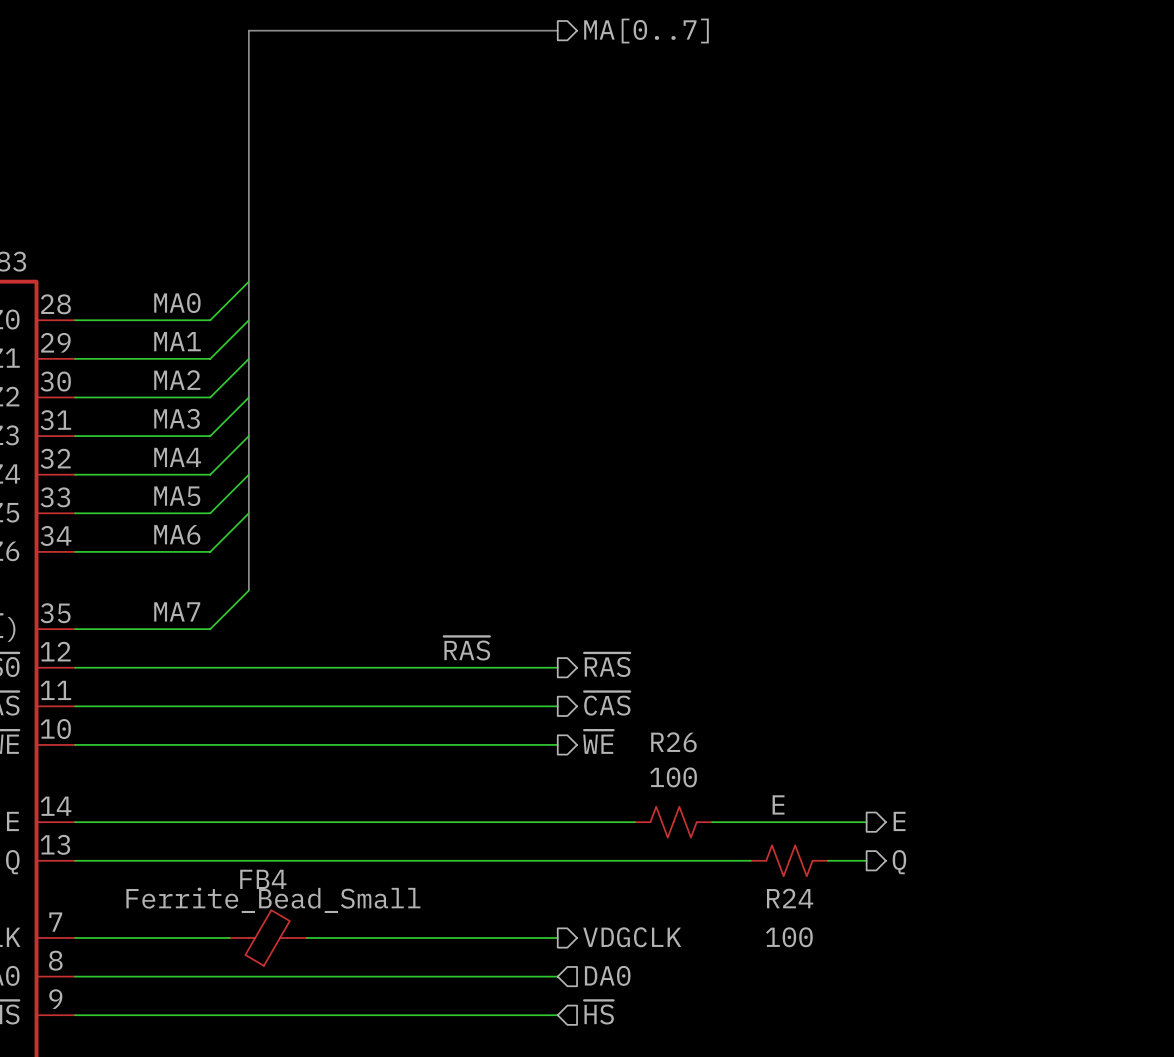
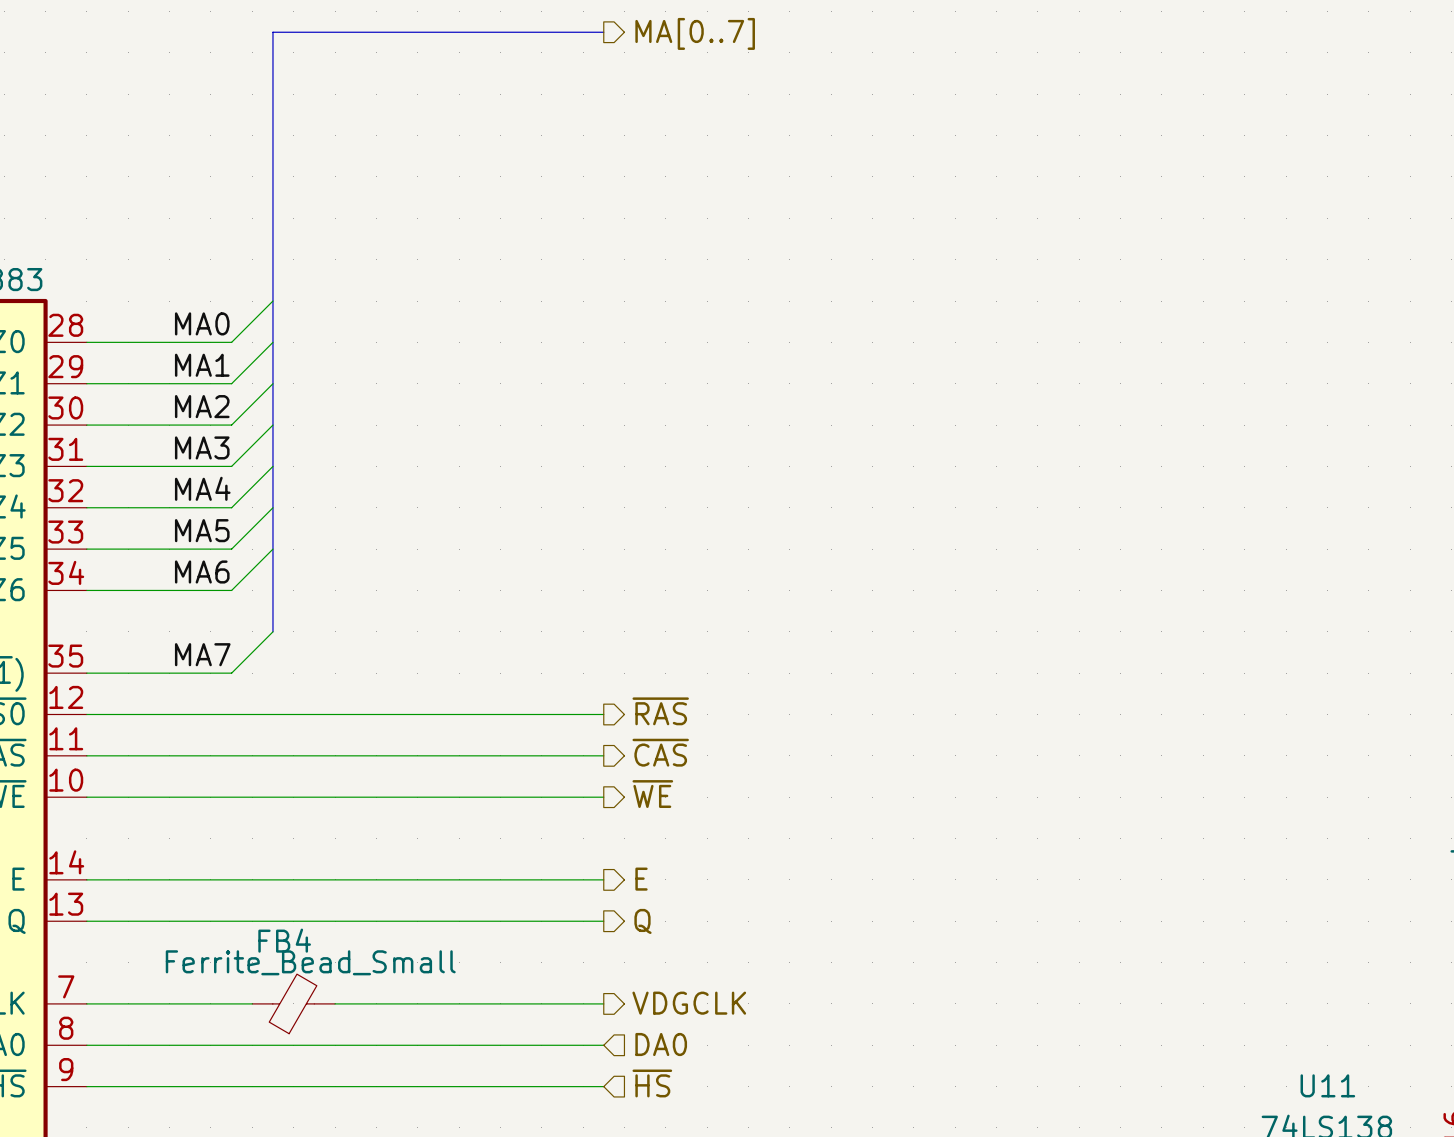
label: ~{RAS} (466, 648) -> none
label: E (778, 804) -> none
hierarchical label position: E (899, 821) -> E (641, 879)
wire: (557, 822) (634, 822) -> none
R26: 100 (673, 822) -> none
wire: (712, 822) (866, 822) -> none
wire: (557, 860) (750, 860) -> none
R24: 100 (789, 860) -> none
wire: (828, 860) (866, 860) -> none
hierarchical label position: Q (899, 862) -> Q (642, 921)

